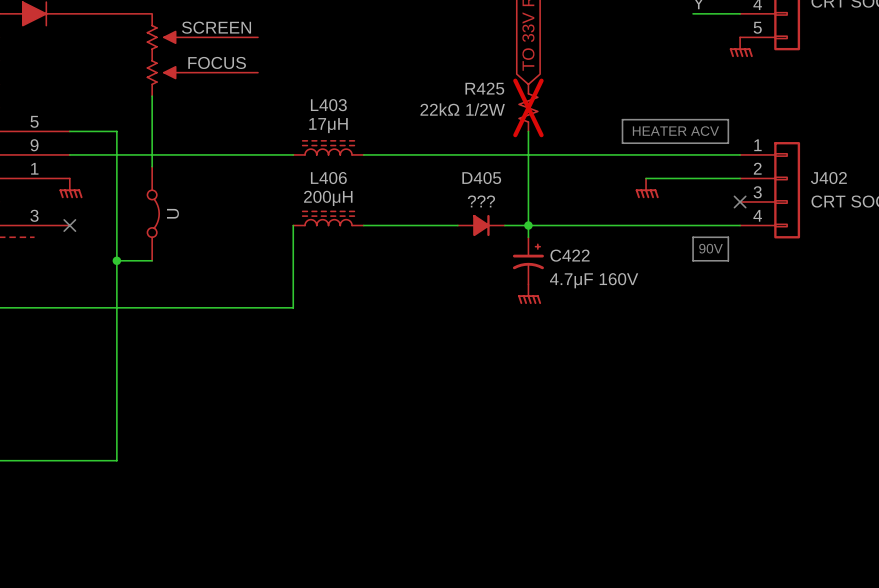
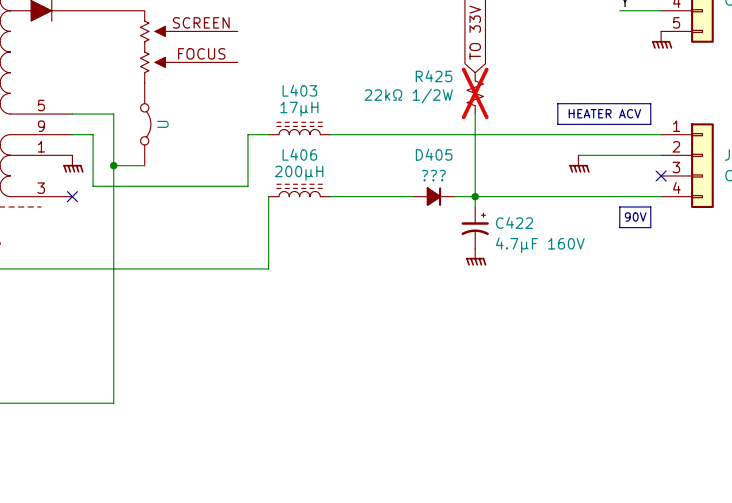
wire: (152, 96) (152, 166) -> none
wire: (93, 154) (269, 154) -> (93, 134) (93, 186) (247, 186) (247, 134)
junction: none -> (113, 165)
U position: (153, 213) -> (145, 124)
wire: (116, 260) (152, 260) -> (113, 165) (144, 165)
junction: (116, 260) -> none

